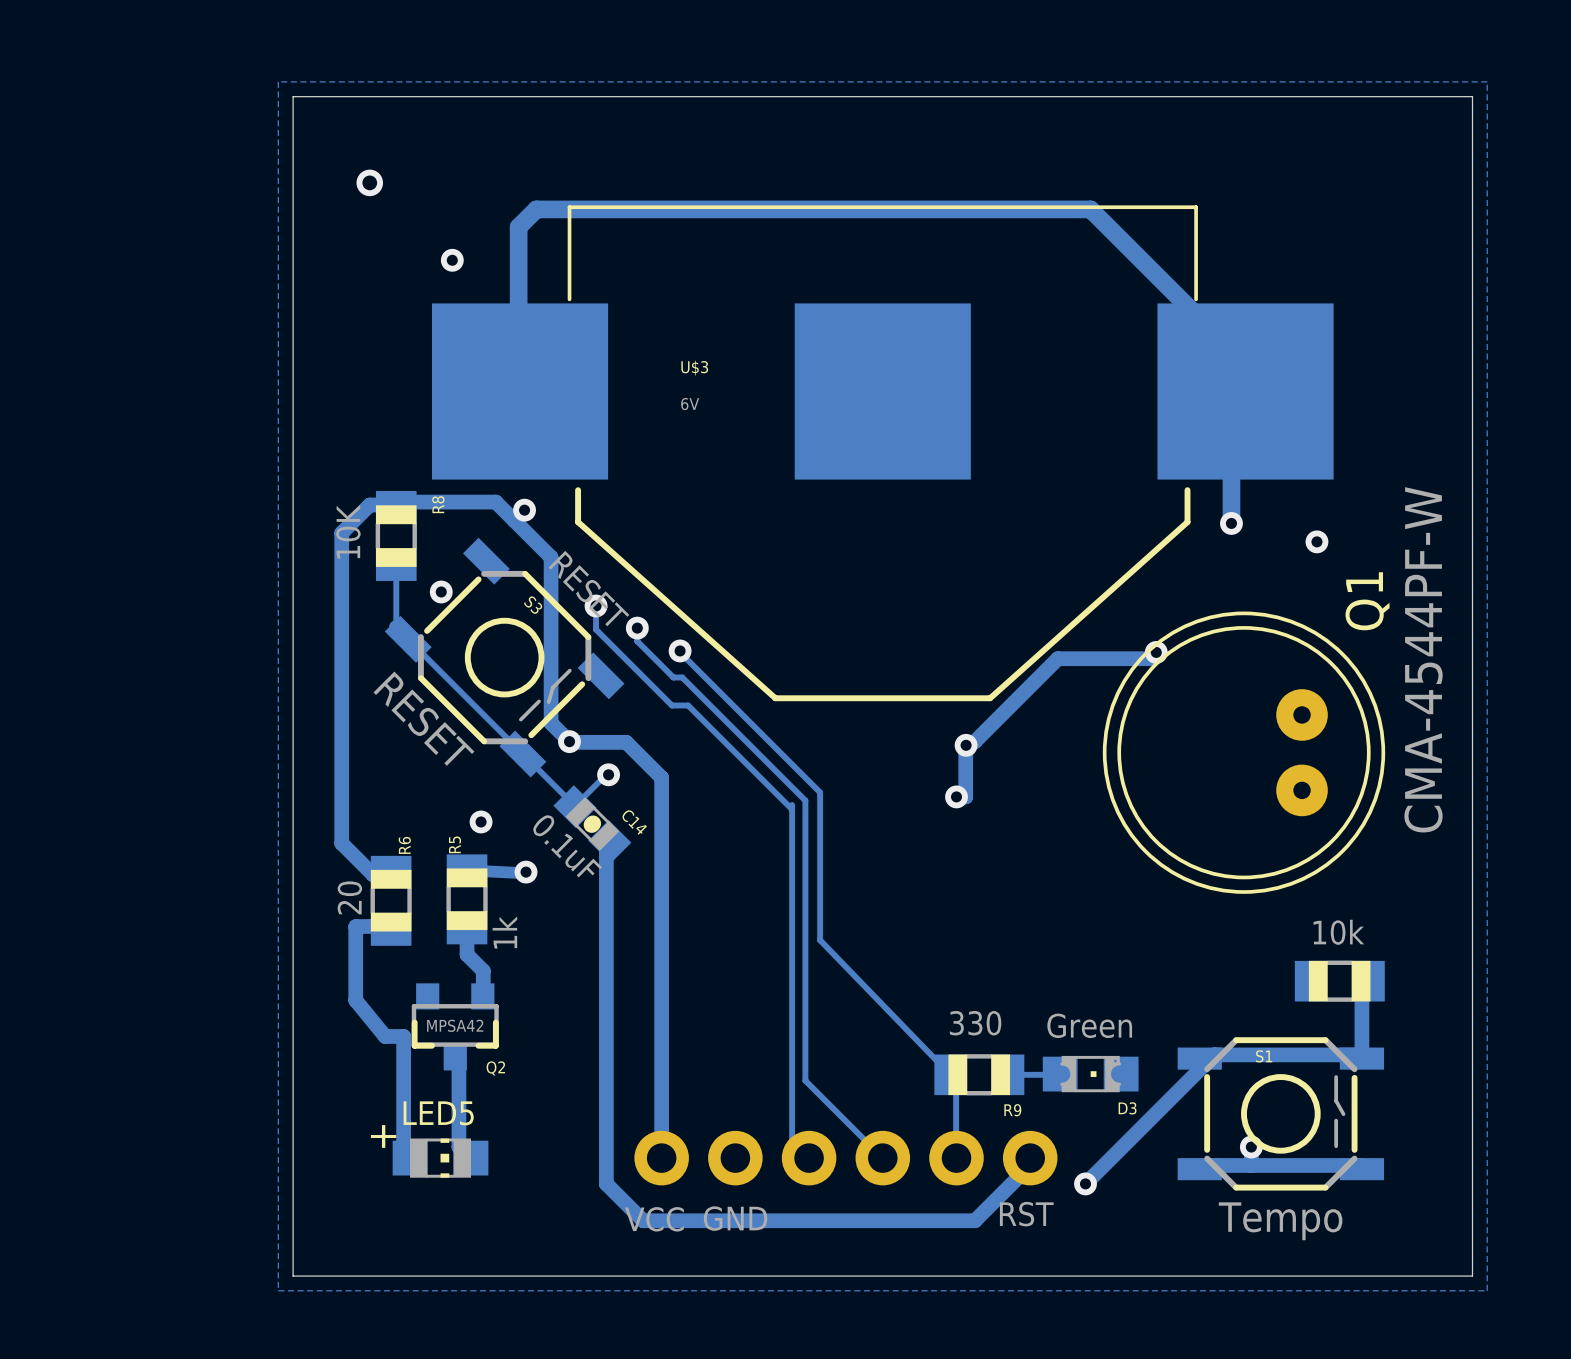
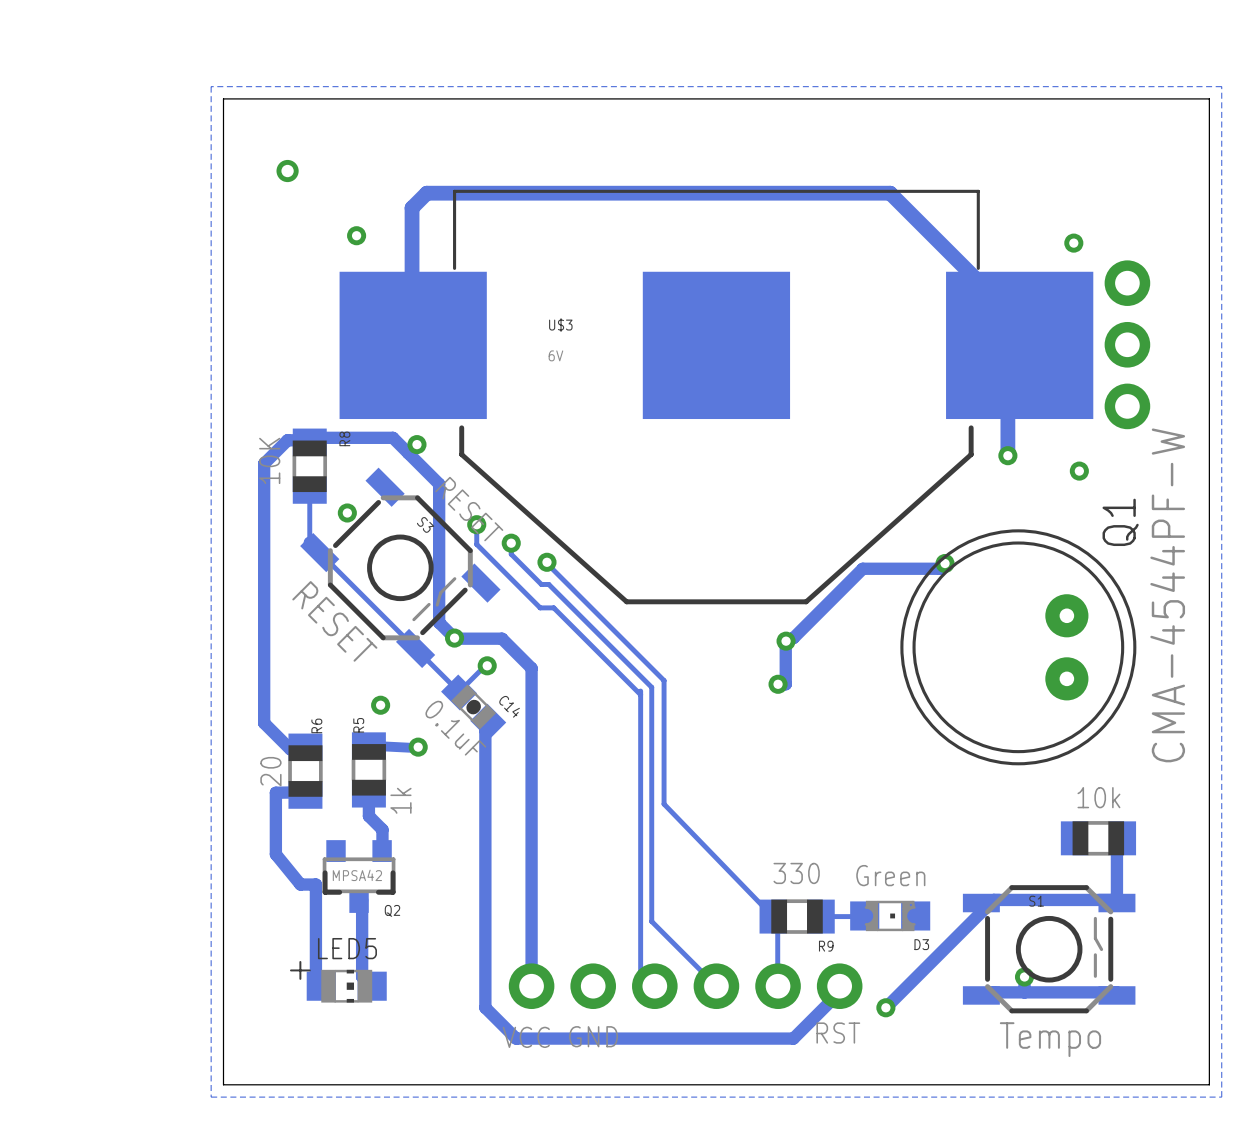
via: none -> (1073, 243)
part: none -> (1127, 344)

